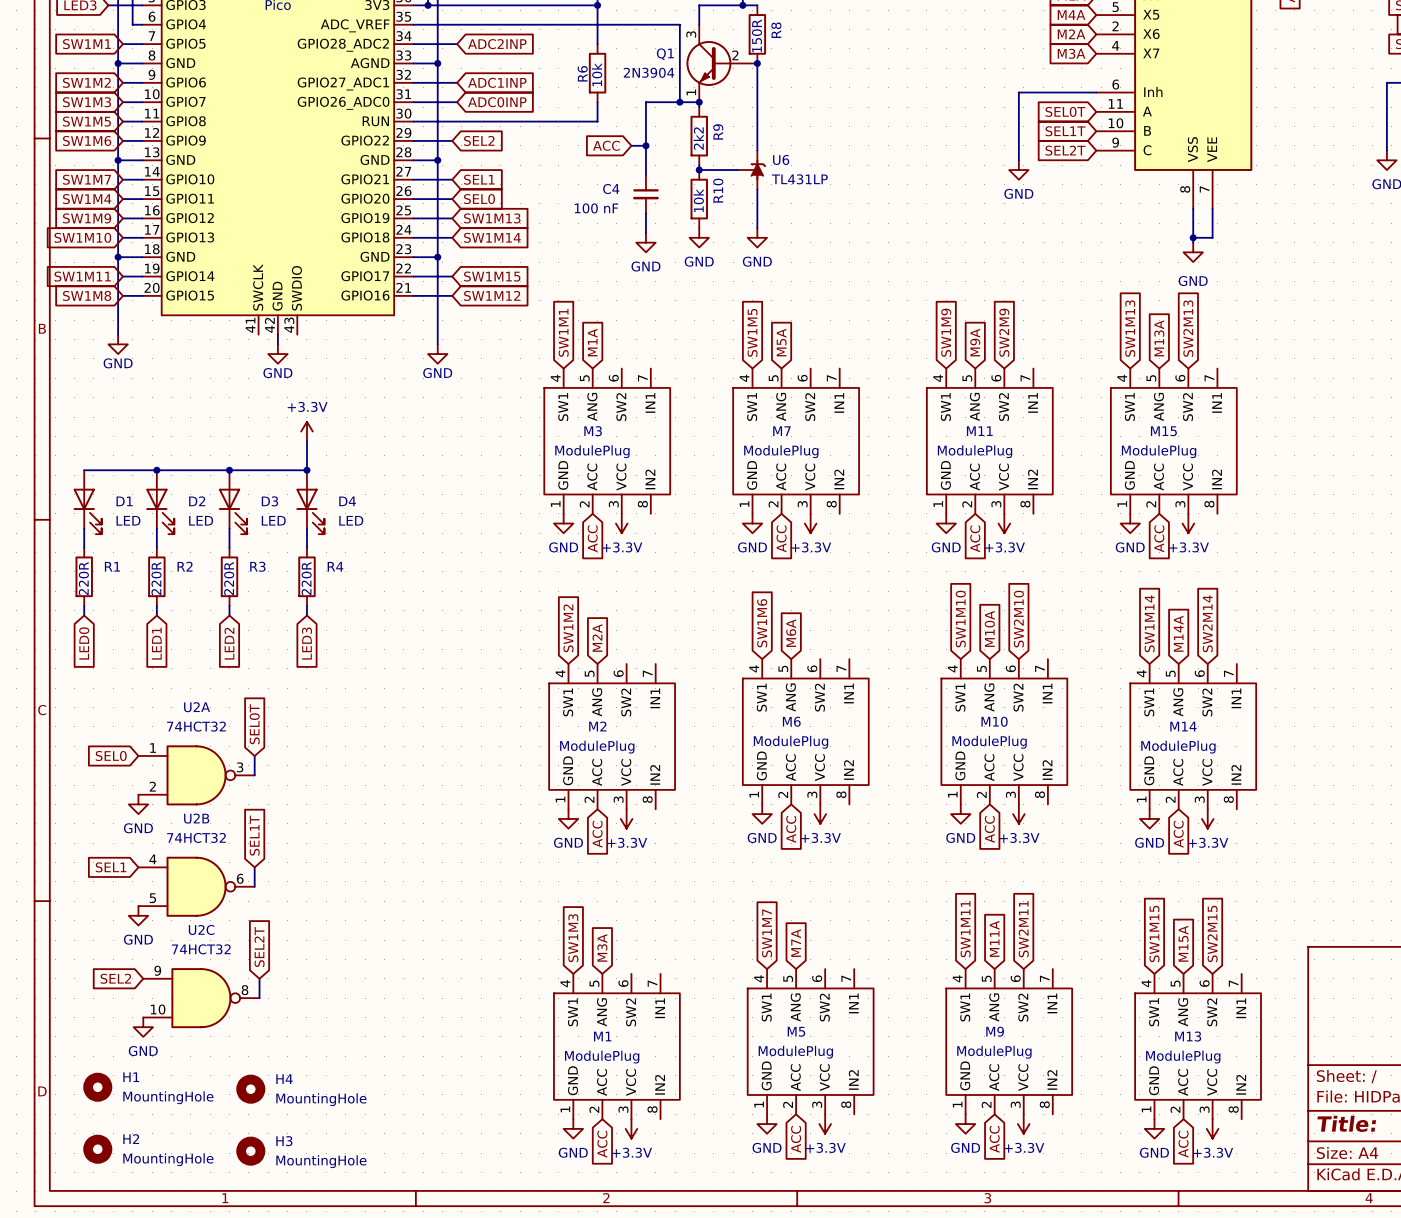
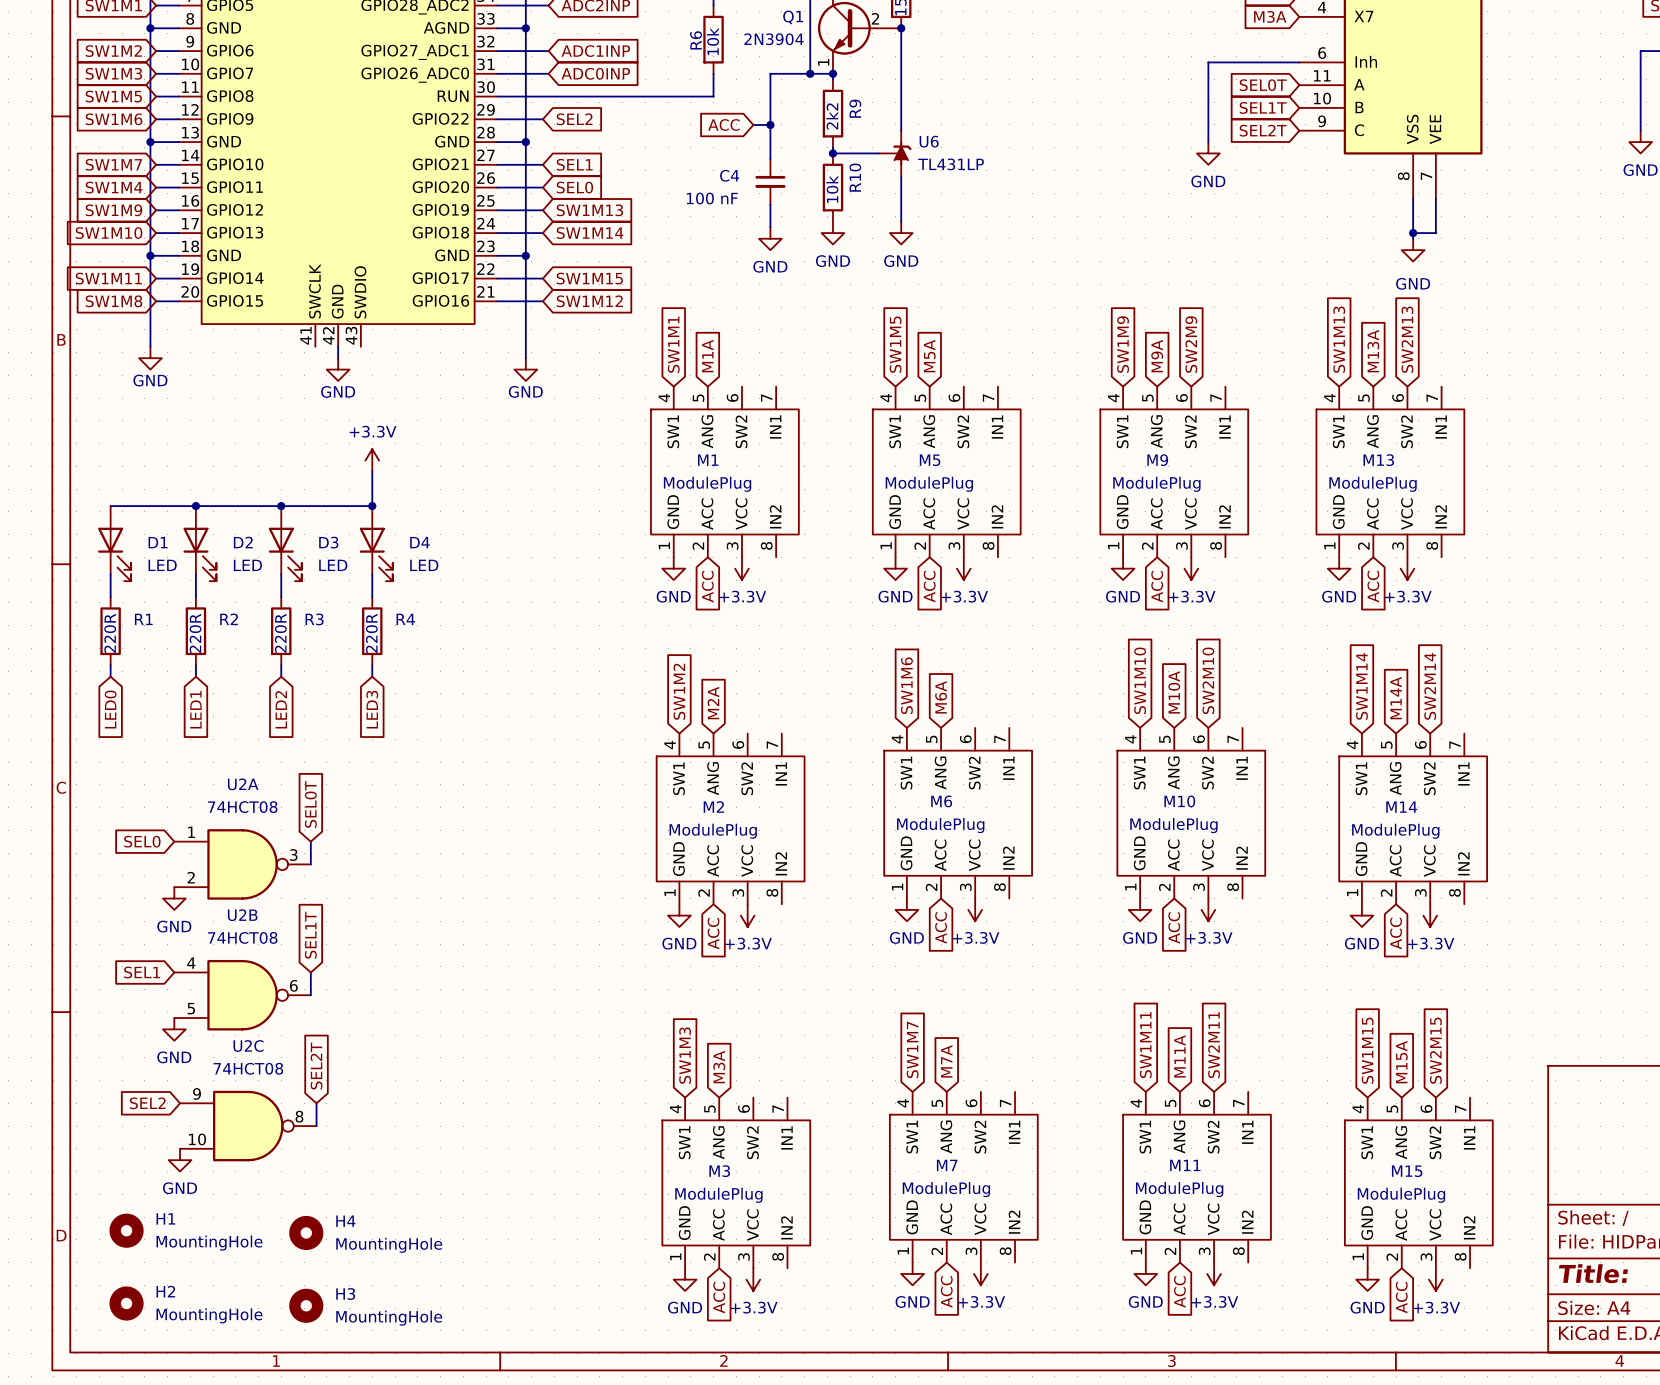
M3 name: M3 (593, 431) -> M1 (708, 460)
M7 name: M7 (781, 431) -> M5 (930, 460)
M11 name: M11 (979, 431) -> M9 (1157, 460)
M15 name: M15 (1163, 431) -> M13 (1378, 460)
U2A value: 74HCT32 (196, 726) -> 74HCT08 (242, 807)
U2B value: 74HCT32 (196, 837) -> 74HCT08 (242, 937)
U2C value: 74HCT32 (201, 949) -> 74HCT08 (248, 1068)
M5 name: M5 (796, 1031) -> M7 (947, 1165)
M9 name: M9 (995, 1031) -> M11 (1185, 1165)
M1 name: M1 (602, 1036) -> M3 (719, 1171)
M13 name: M13 (1188, 1036) -> M15 (1407, 1171)

